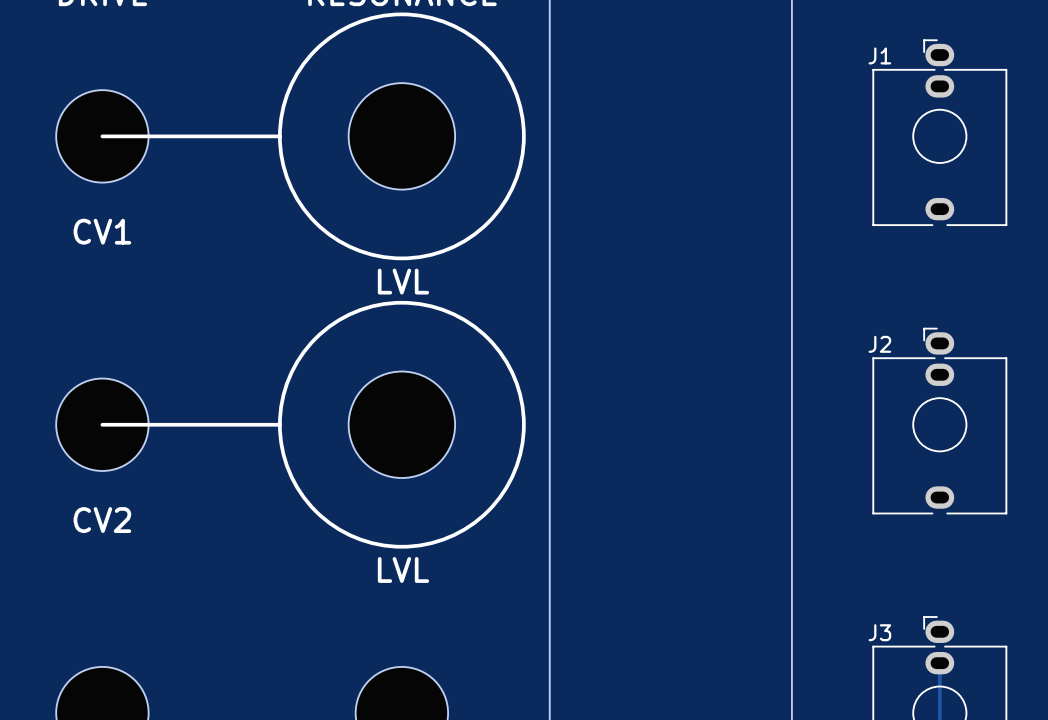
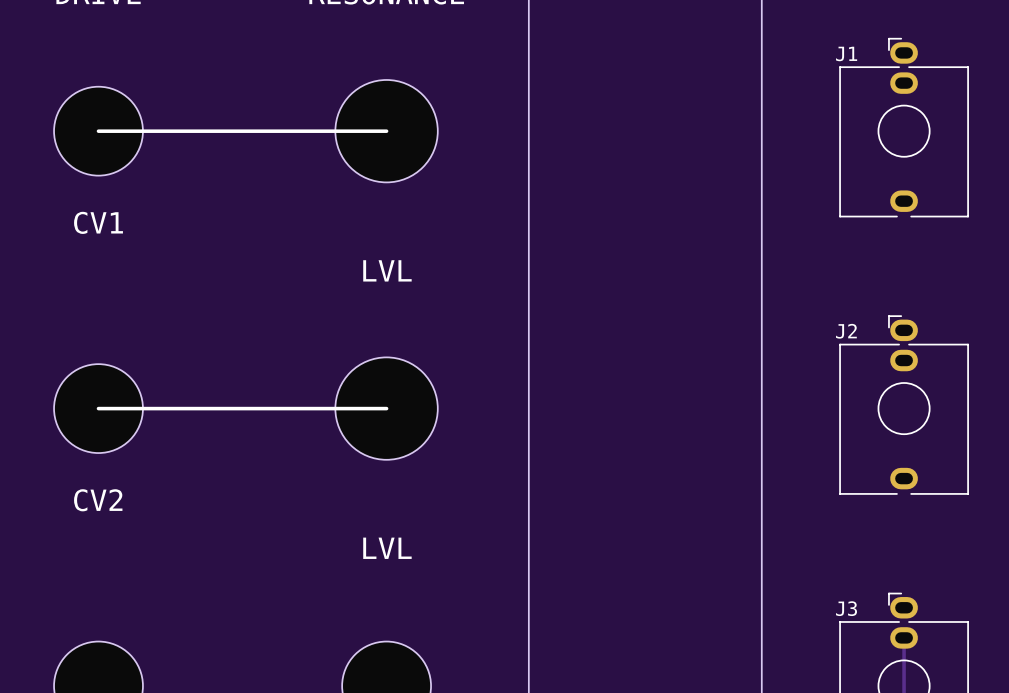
drawing: [278, 12, 526, 261] -> none
line: none -> (269, 131) (386, 131)
drawing: [278, 300, 526, 549] -> none
line: none -> (269, 408) (386, 408)

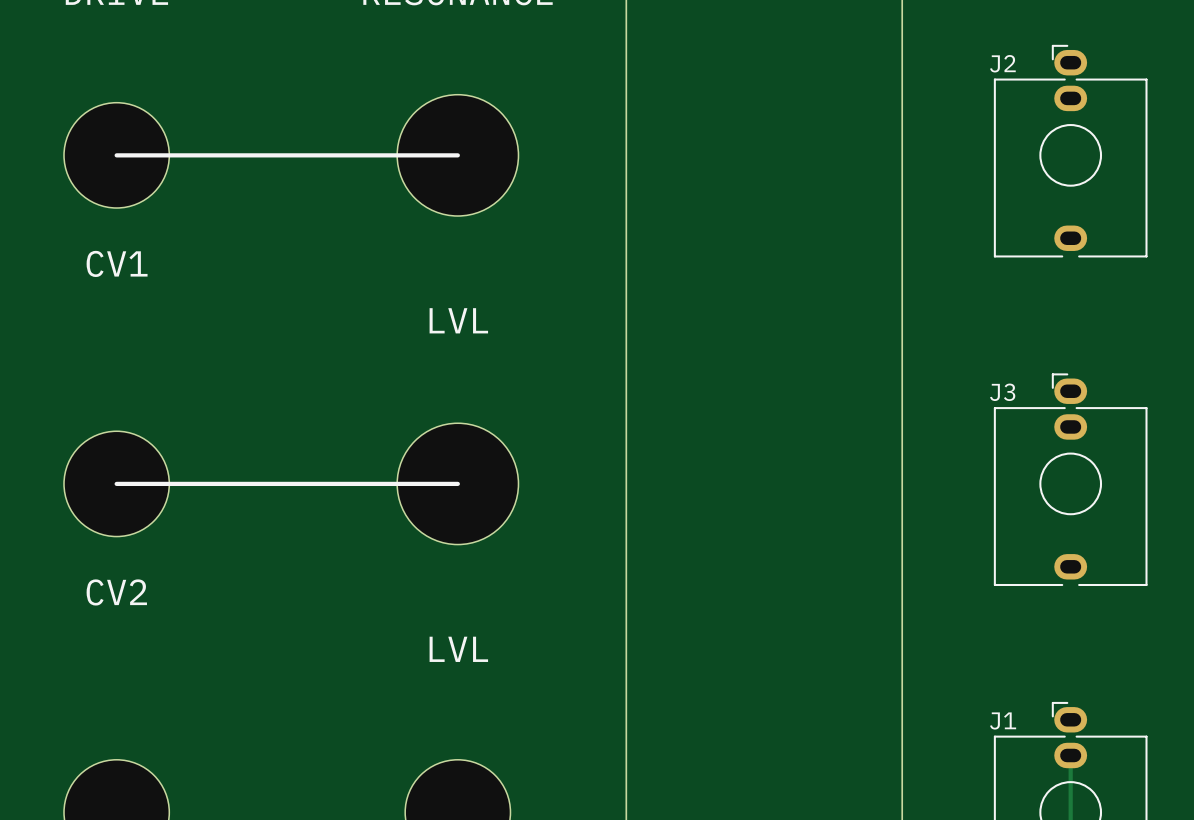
J1 name: J1 (846, 53) -> J2 (1002, 63)
J2 name: J2 (846, 331) -> J3 (1002, 392)
J3 name: J3 (846, 608) -> J1 (1003, 720)

